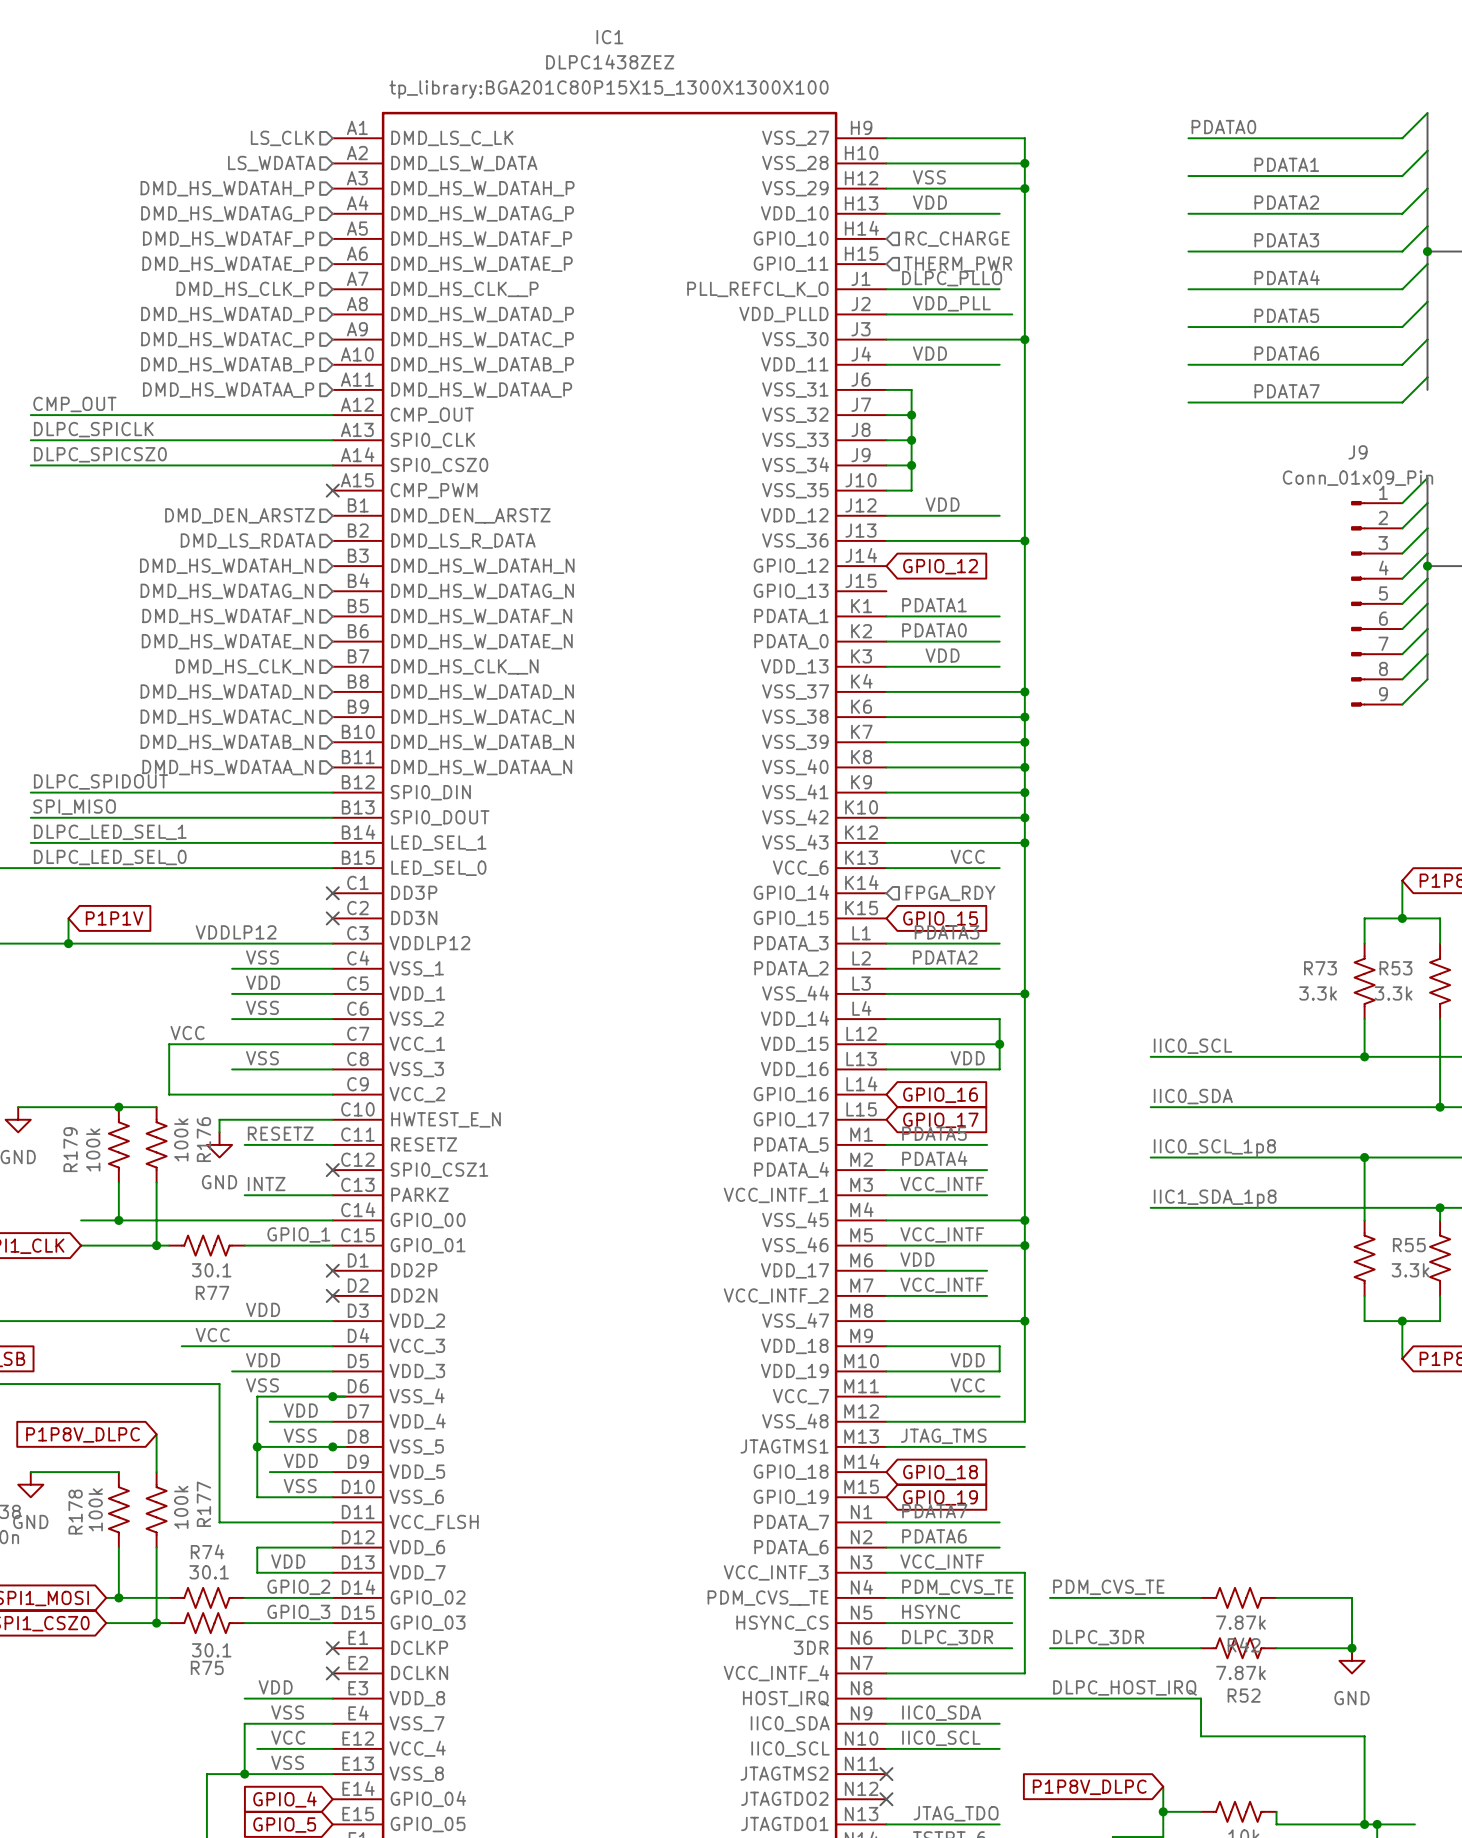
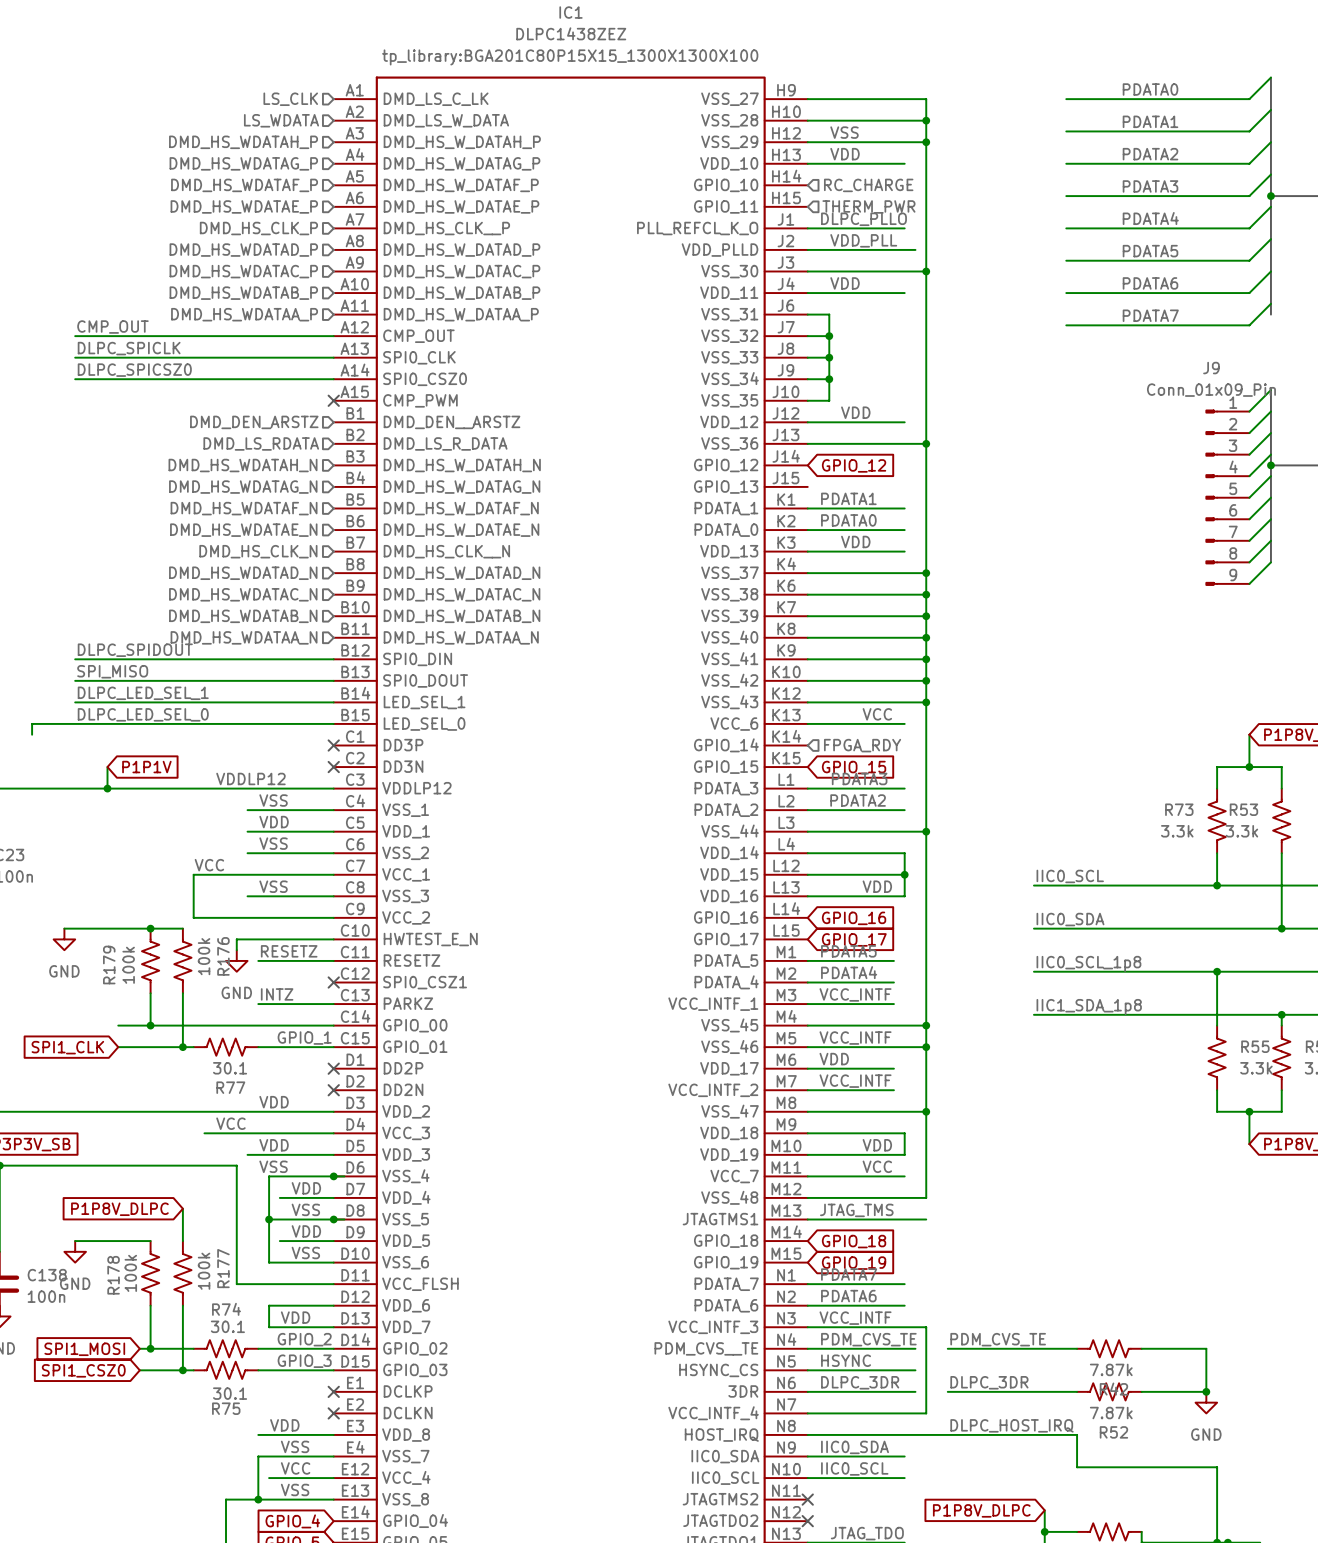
label position: PDATA0 (1223, 127) -> PDATA0 (1150, 89)

